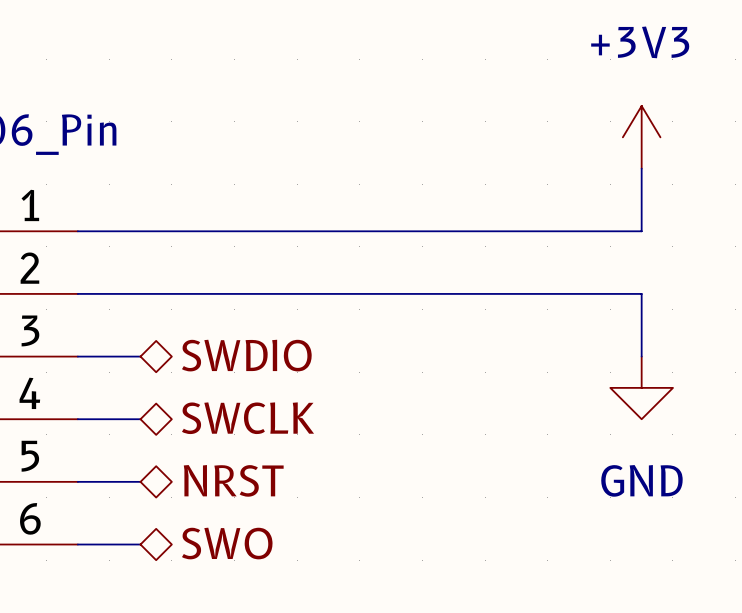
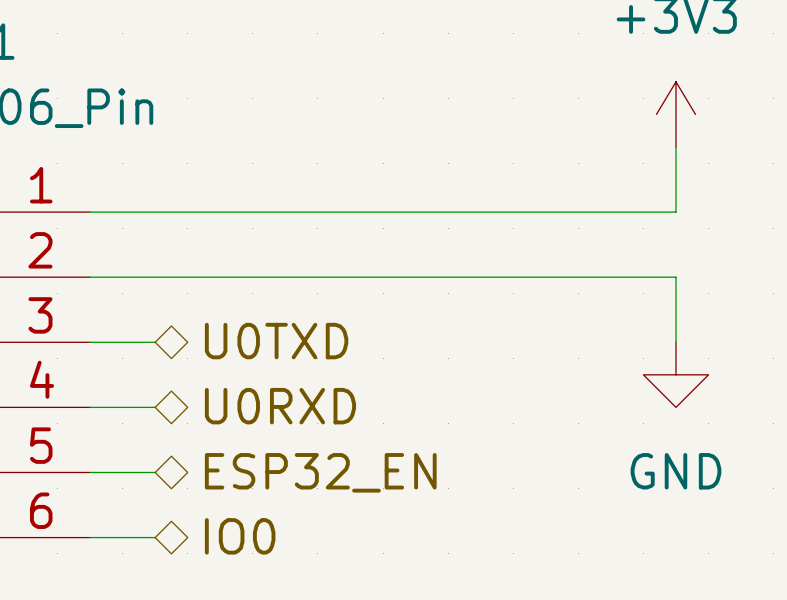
hierarchical label: SWDIO (246, 355) -> U0TXD (276, 341)
hierarchical label: SWCLK (248, 418) -> U0RXD (280, 406)
hierarchical label: NRST (233, 480) -> ESP32_EN (320, 472)
hierarchical label: SWO (227, 543) -> IO0 (240, 536)

